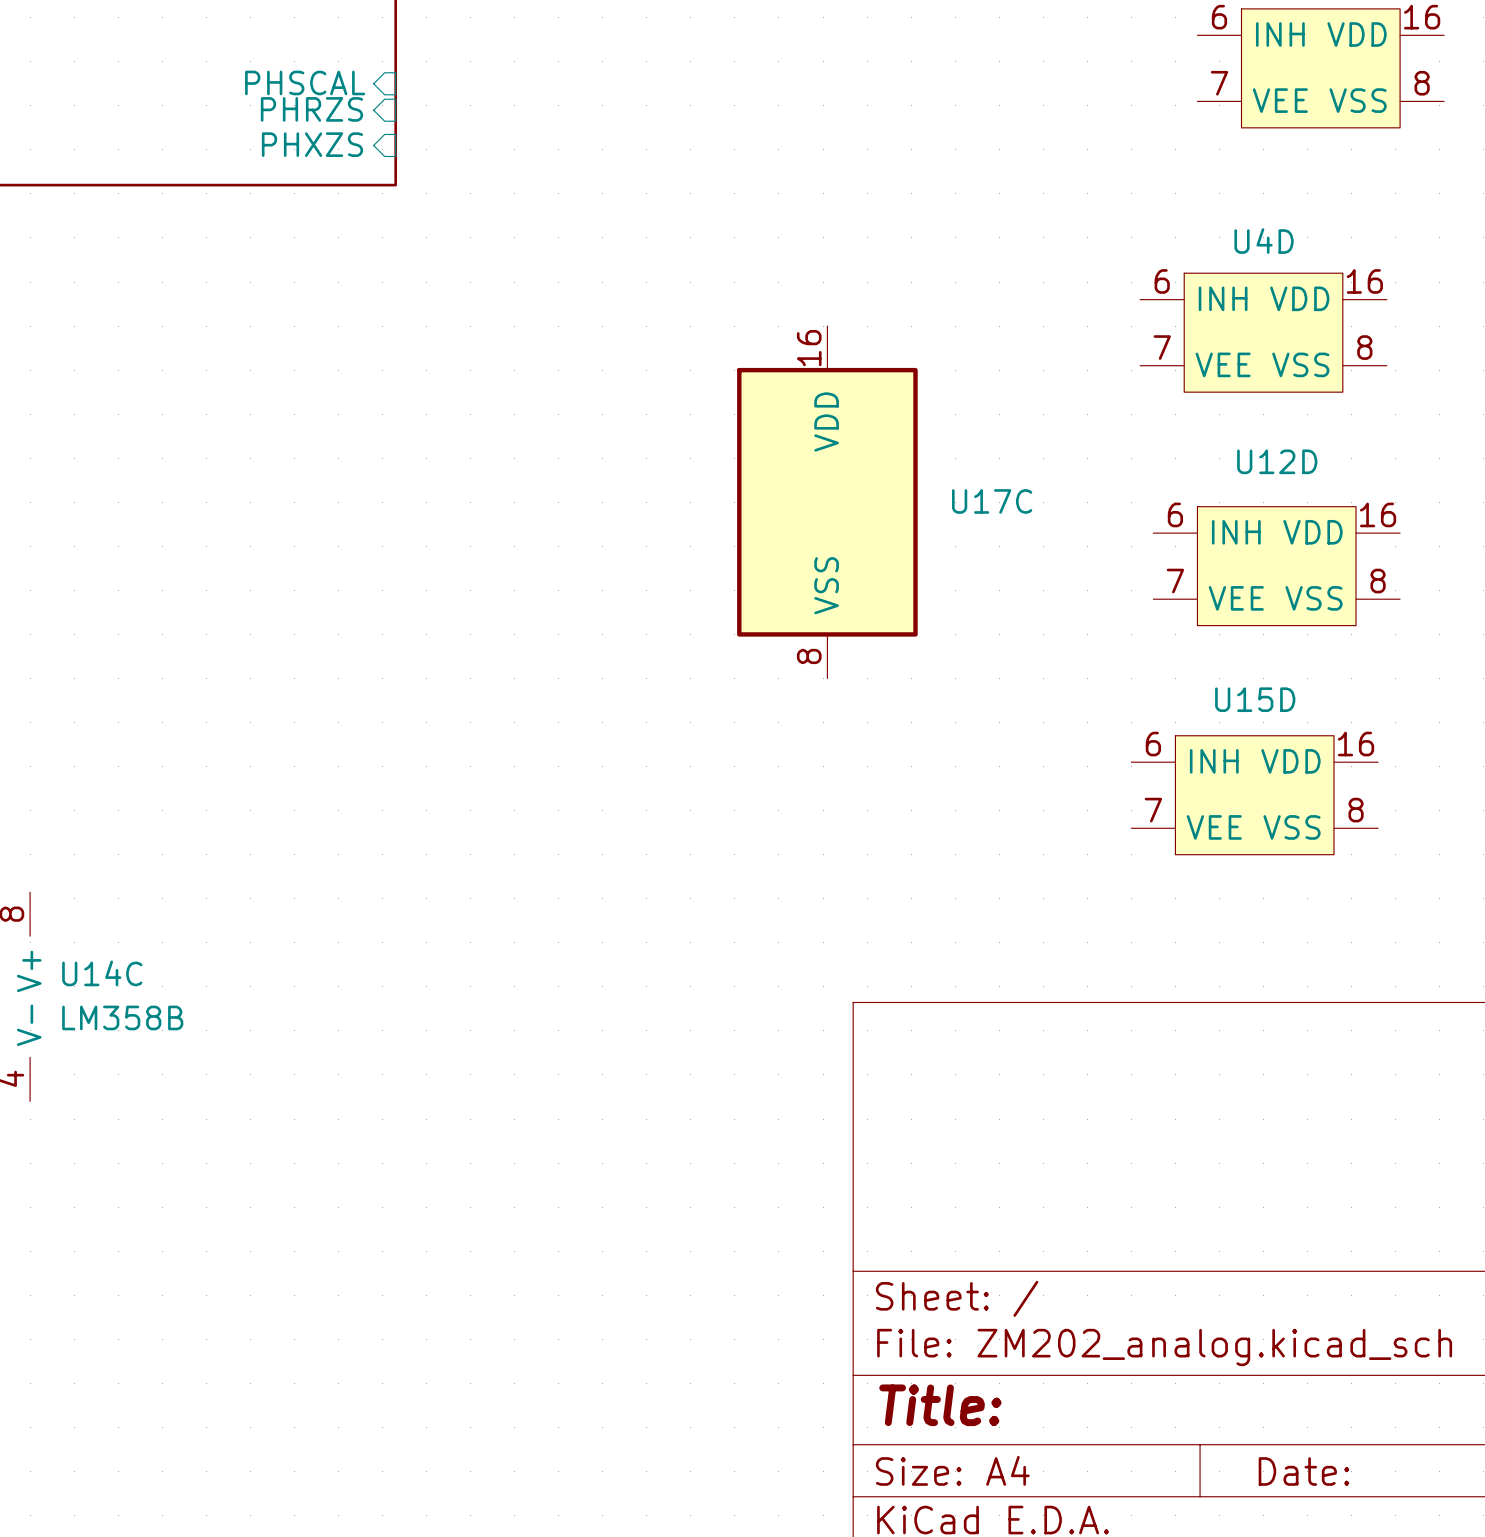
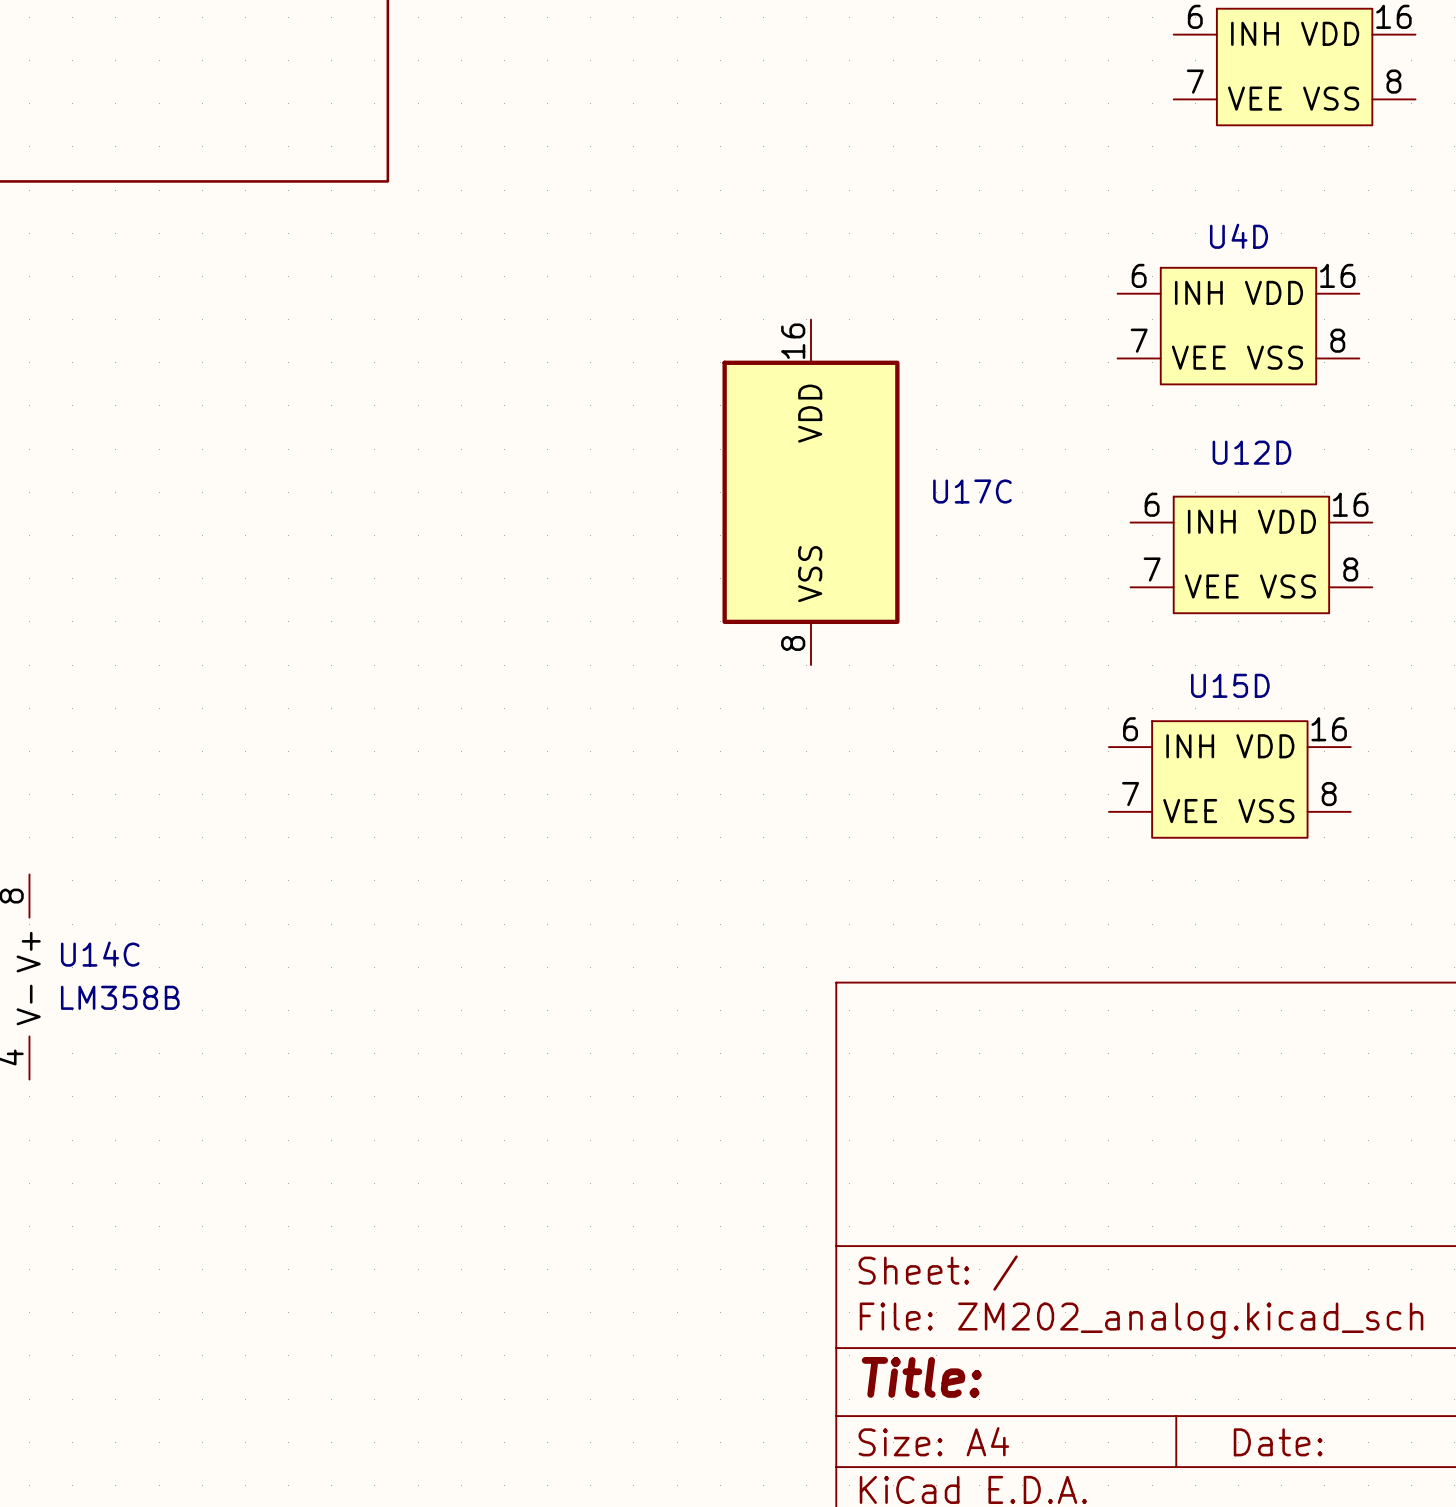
sheet pin: PHSCAL (305, 82) -> none
sheet pin: PHRZS (311, 109) -> none
sheet pin: PHXZS (312, 144) -> none

